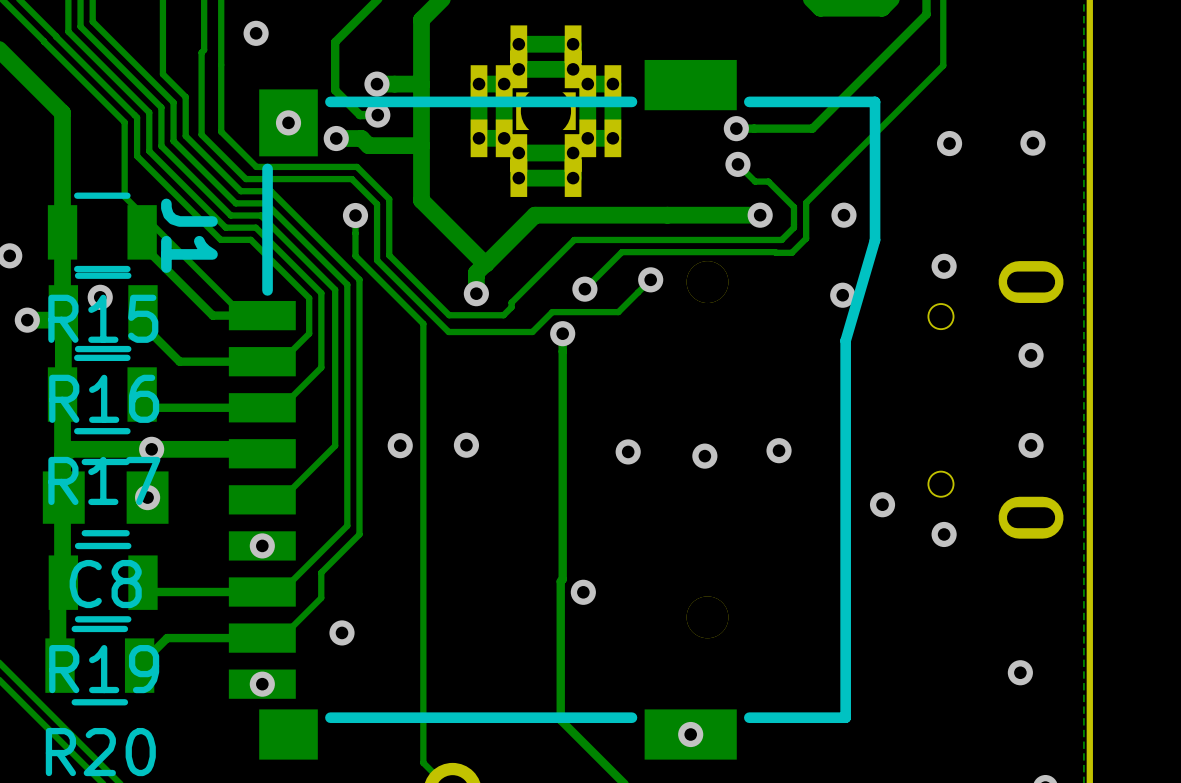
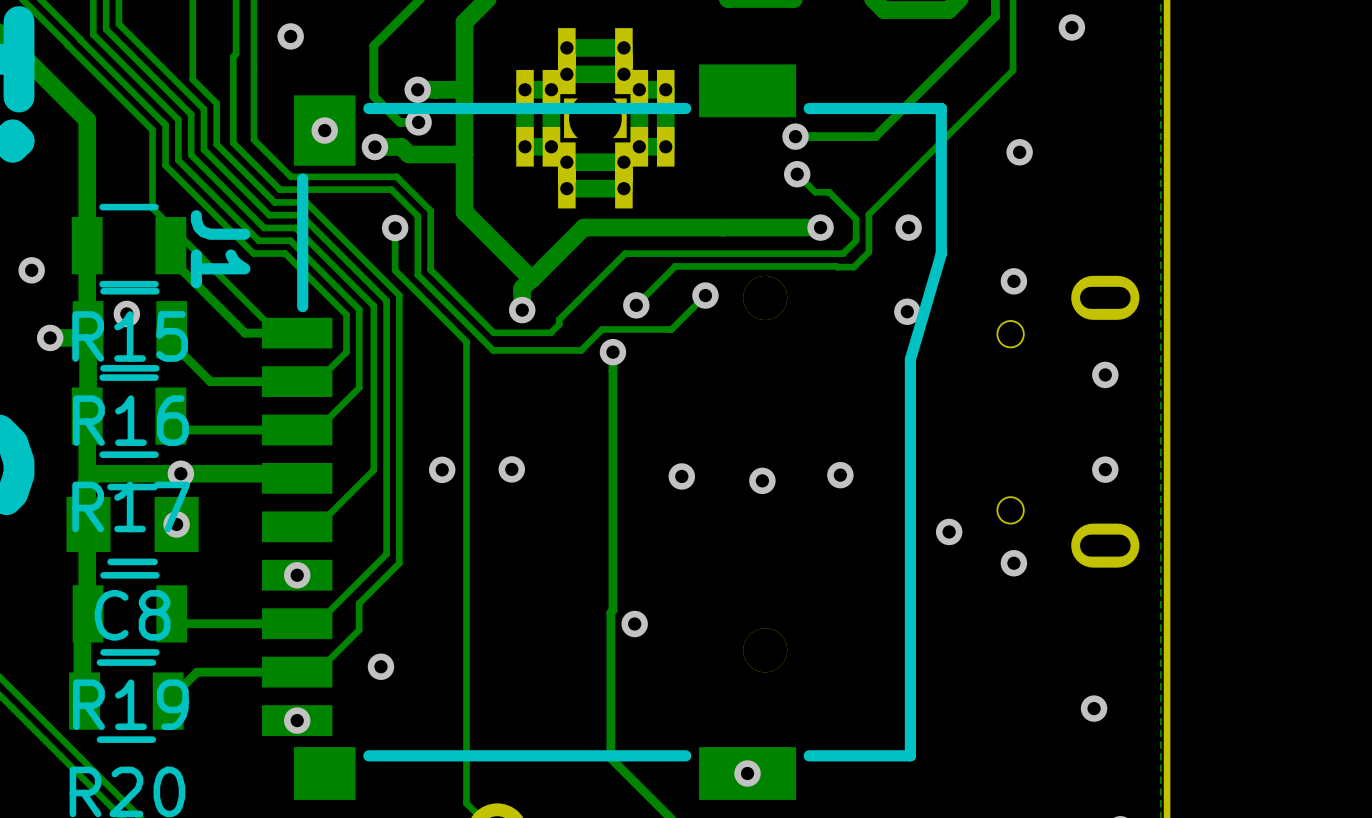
via position: (1032, 143) -> (1071, 27)

